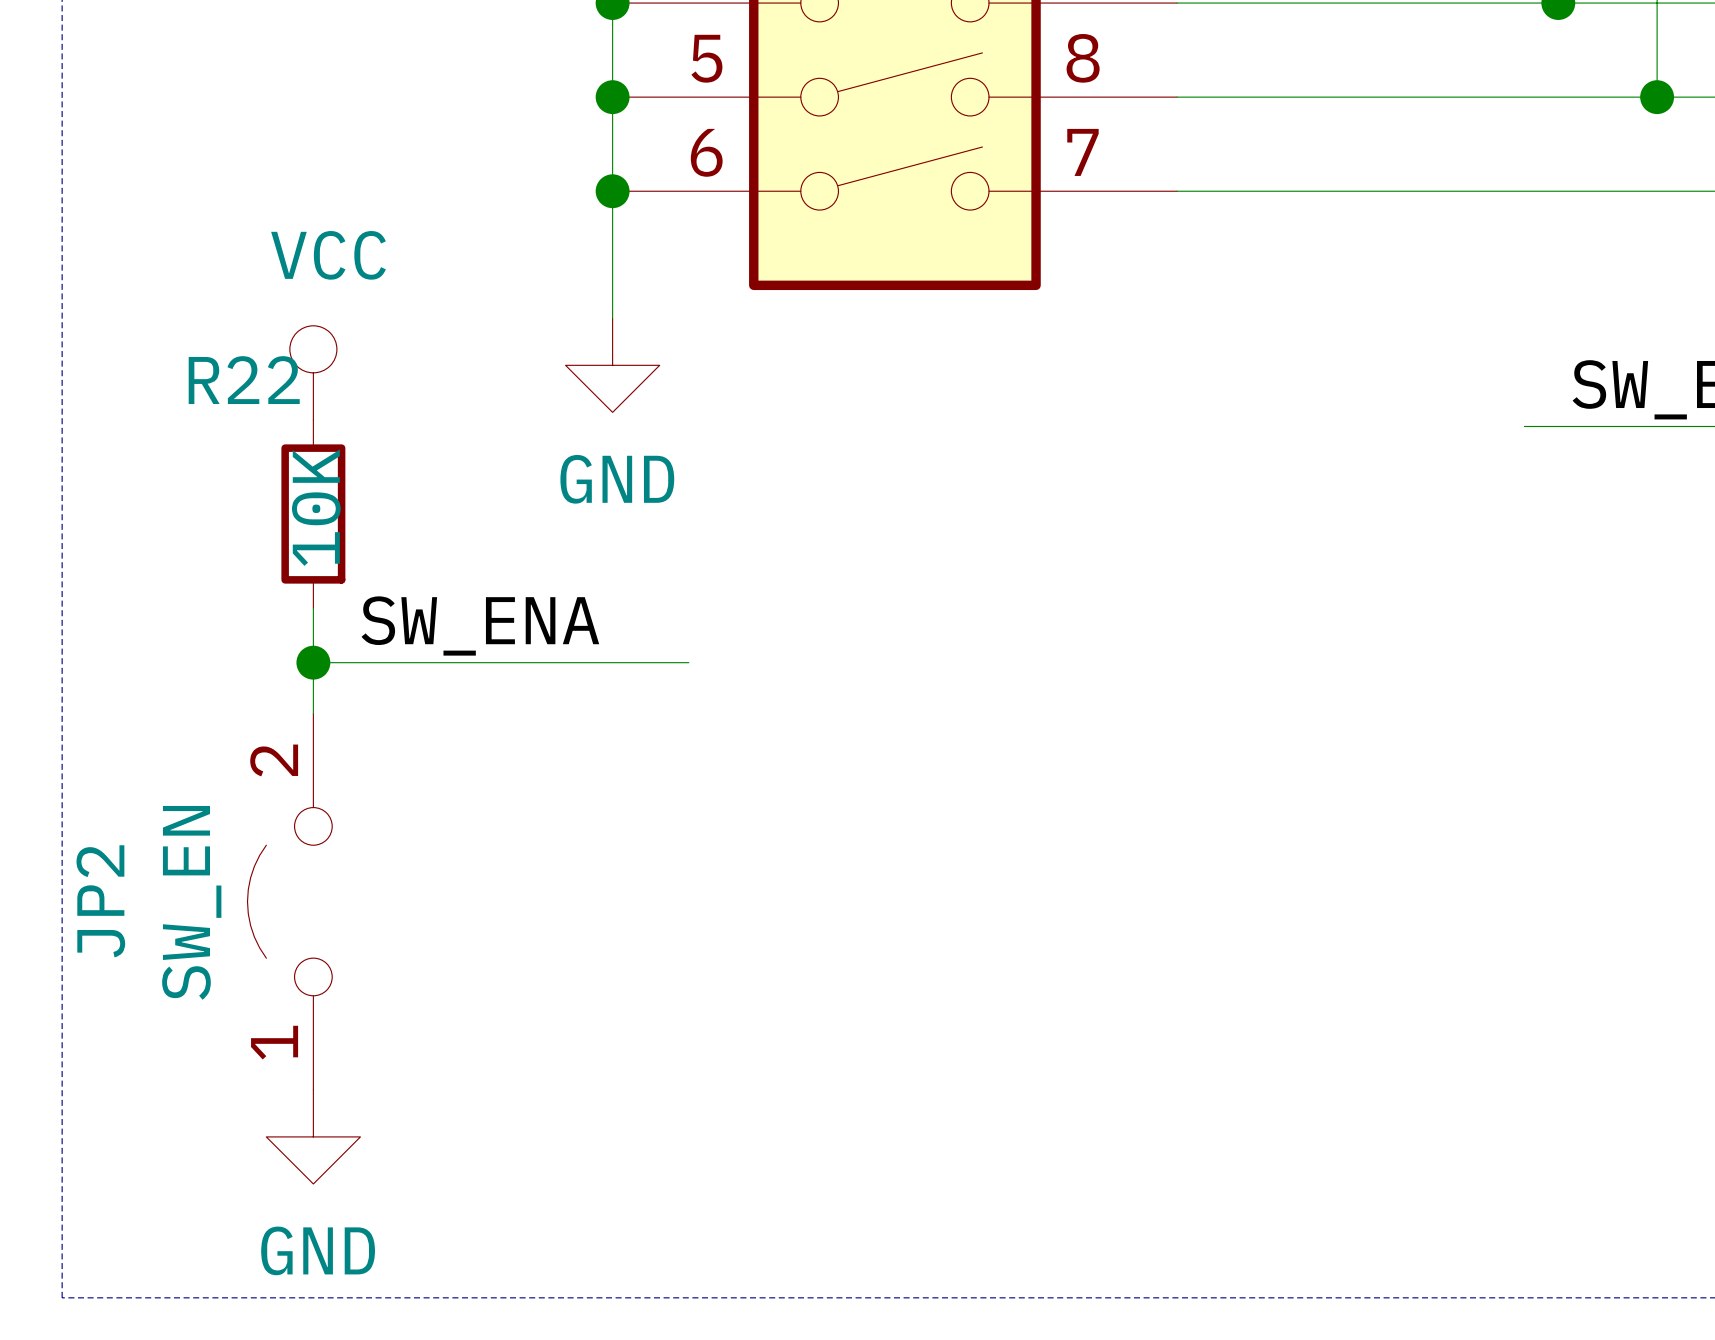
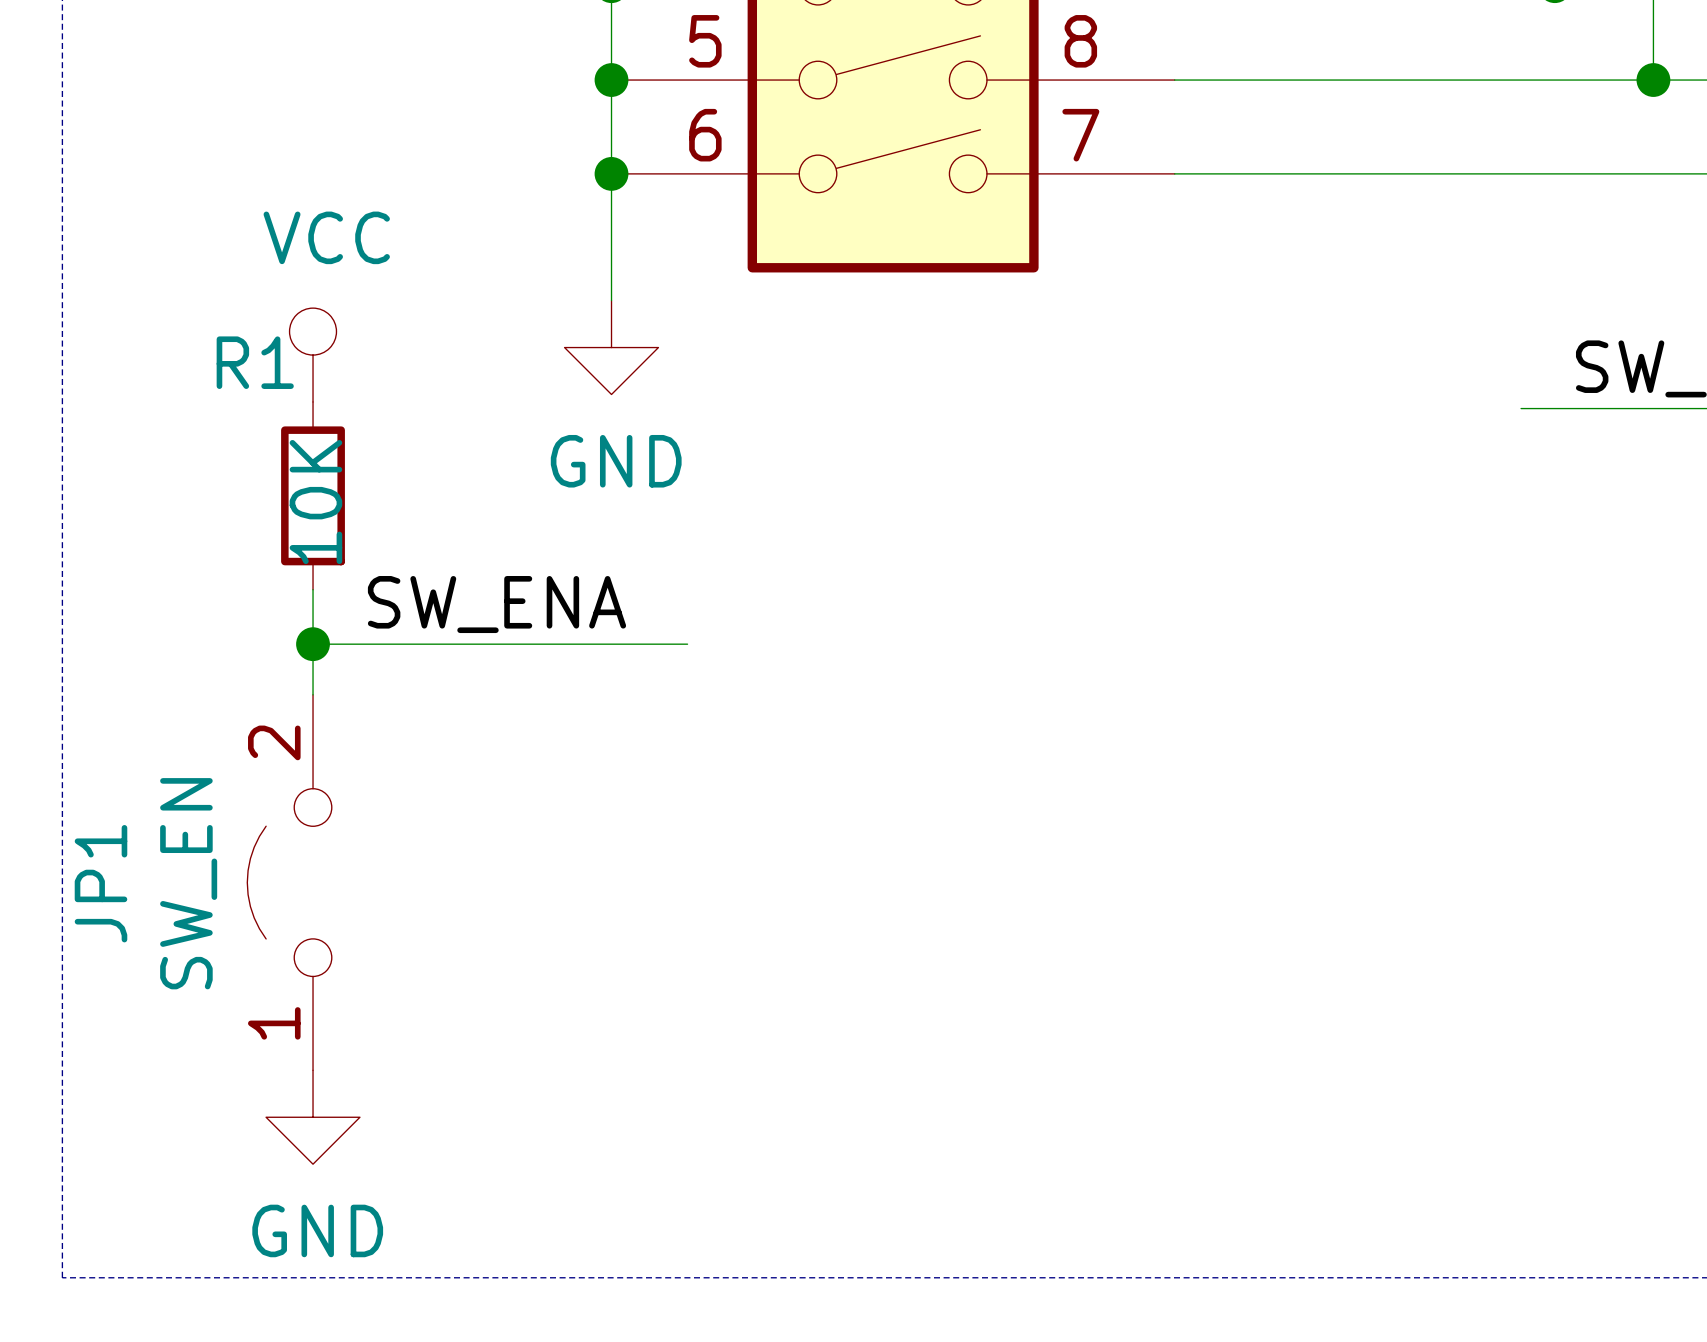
R22 name: R22 (244, 380) -> R1 (255, 362)
JP2 name: JP2 (100, 901) -> JP1 (100, 883)

